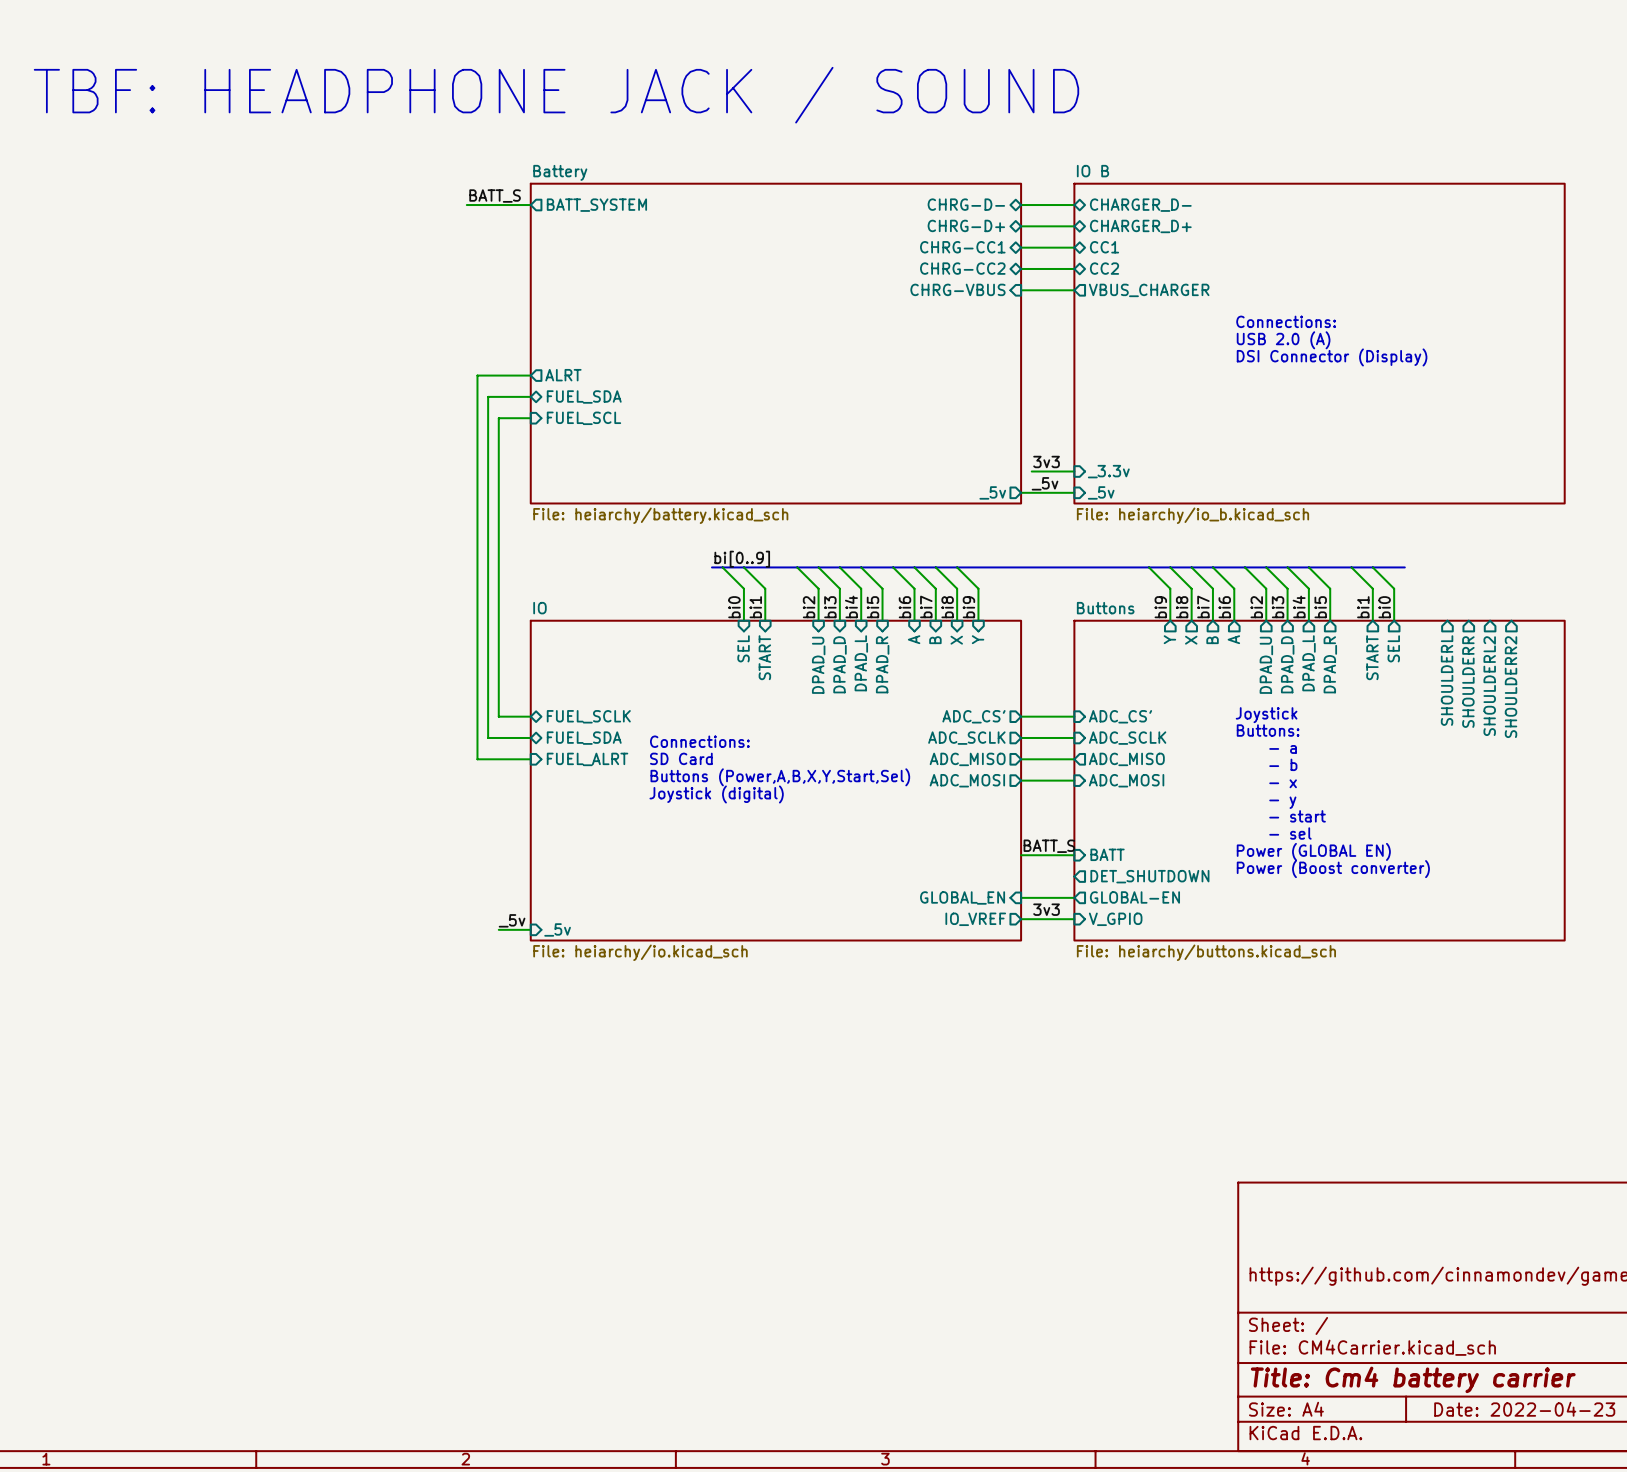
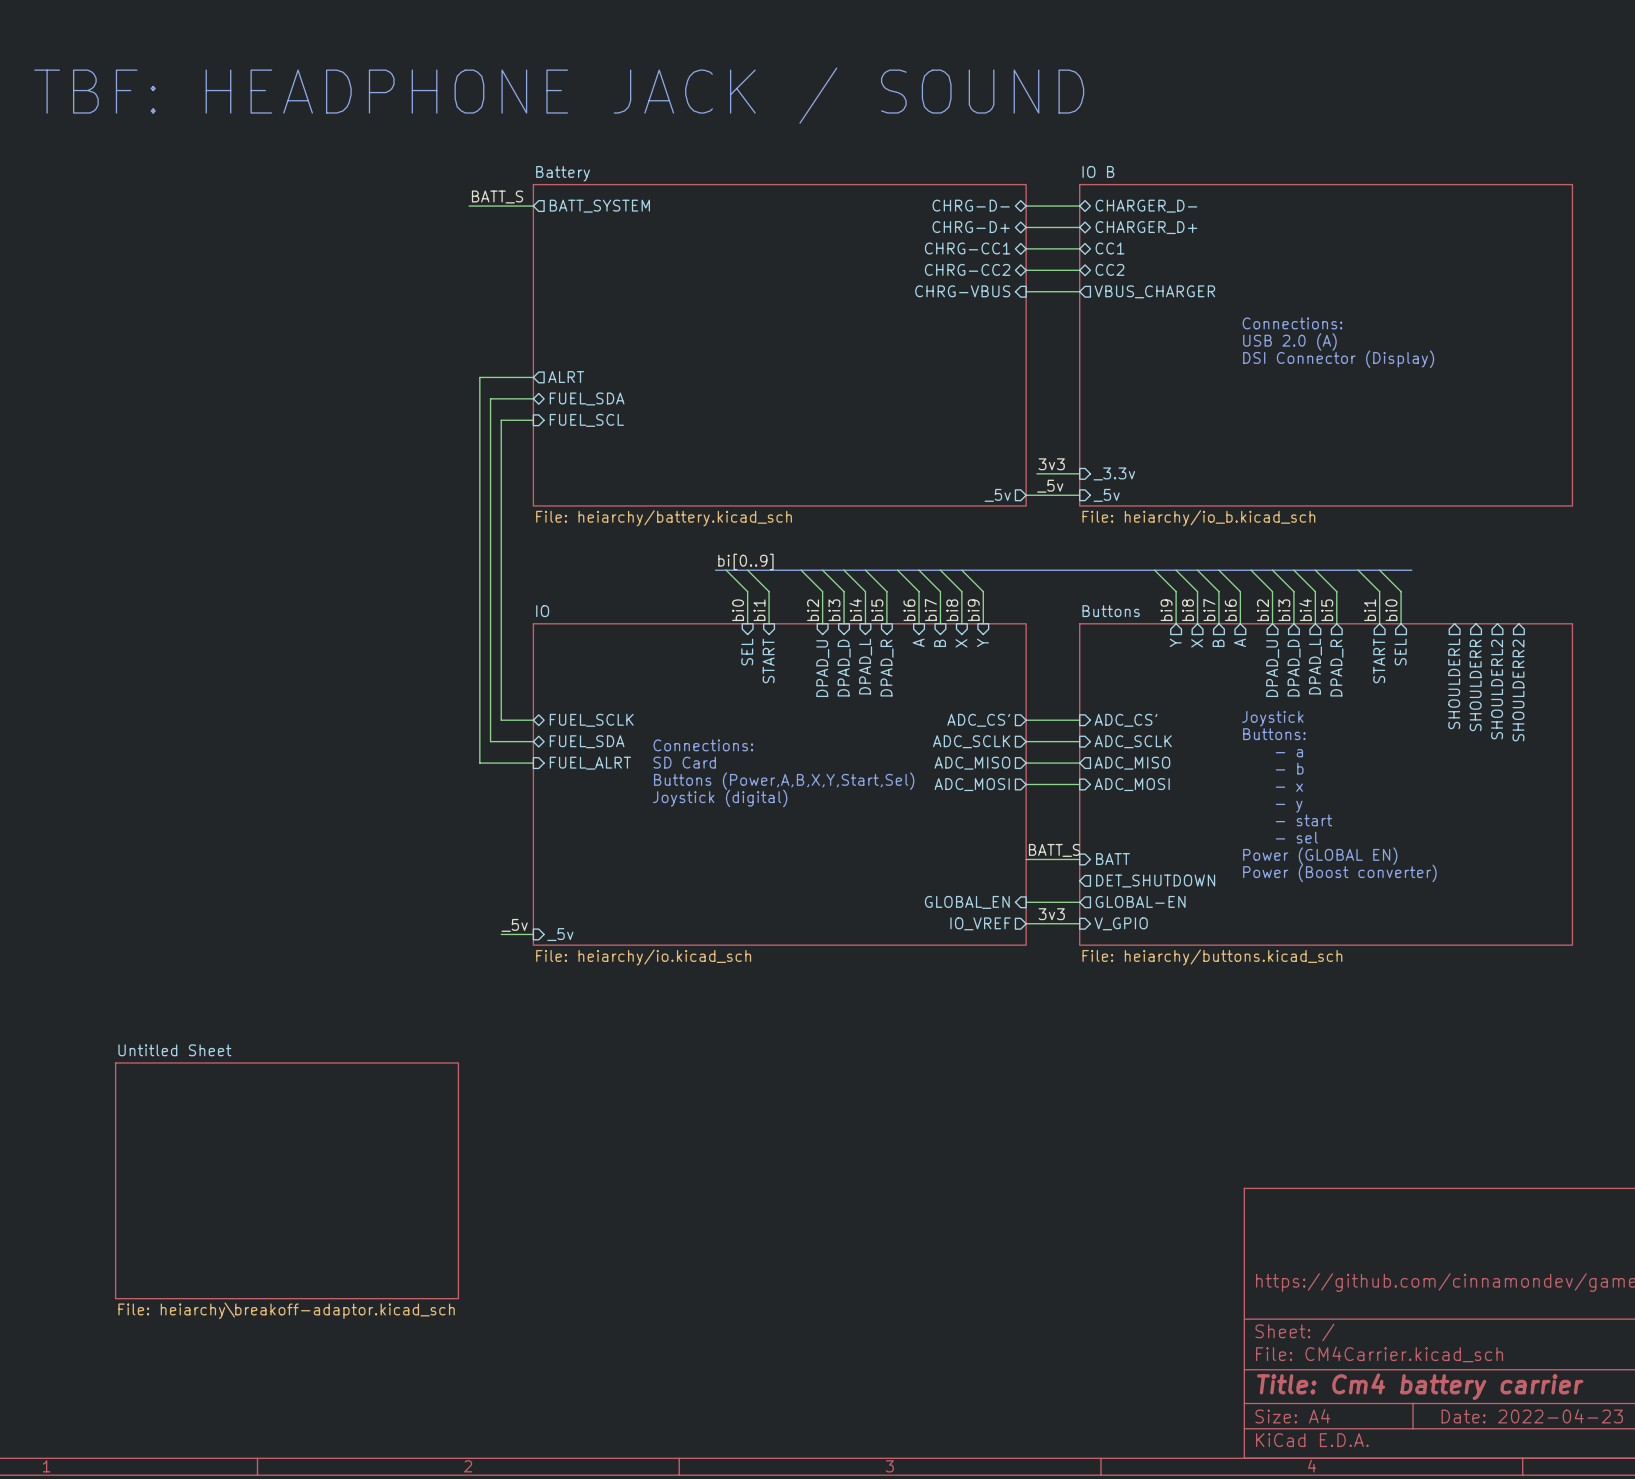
sheet Untitled Sheet: none -> File: heiarchy\breakoff-adaptor.kicad_sch (287, 1180)

